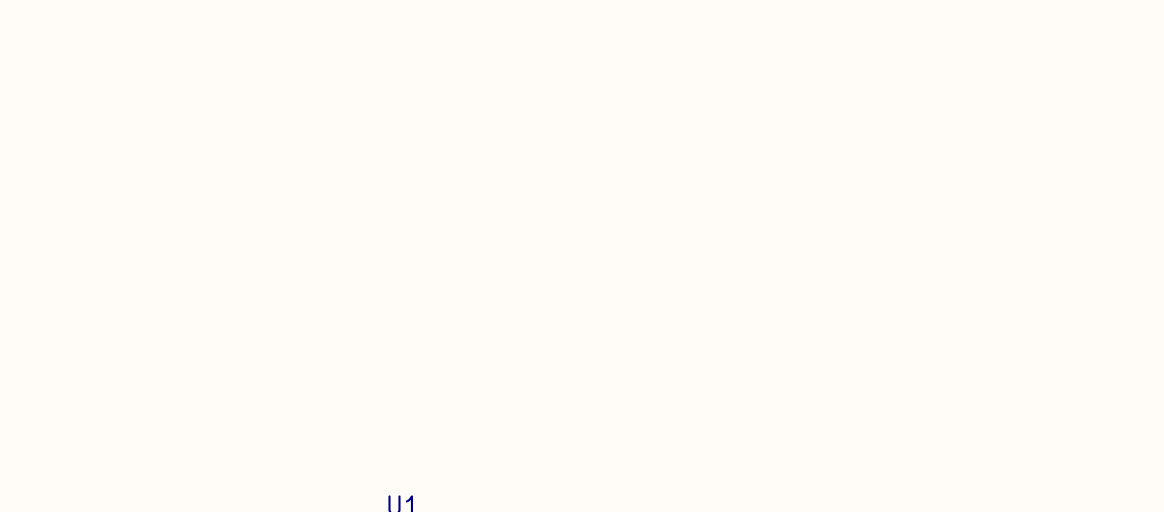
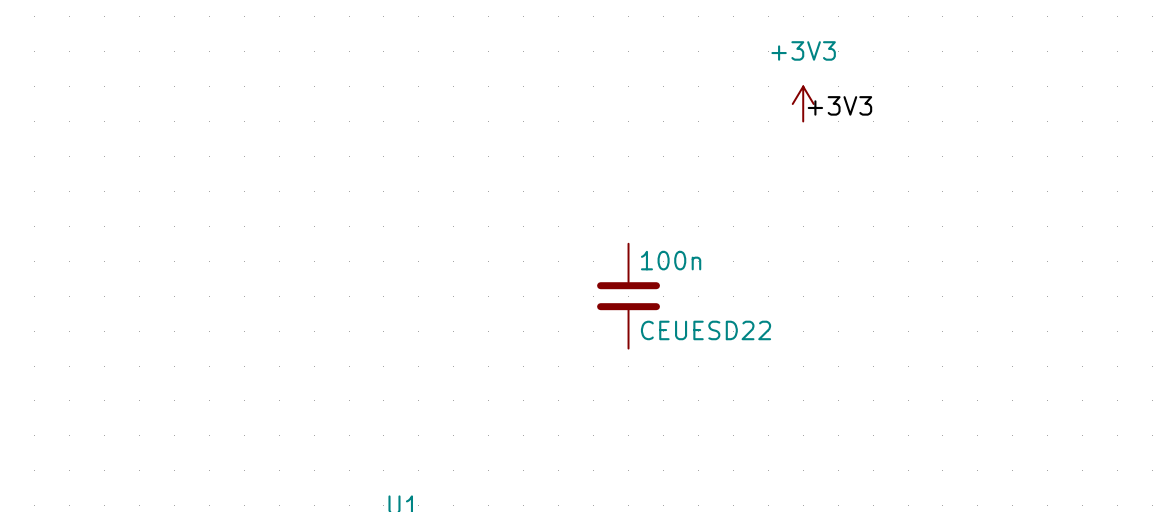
power symbol: none -> +3V3 (803, 104)
label: none -> +3V3 (839, 105)
CEUESD22: none -> 100n (628, 296)

